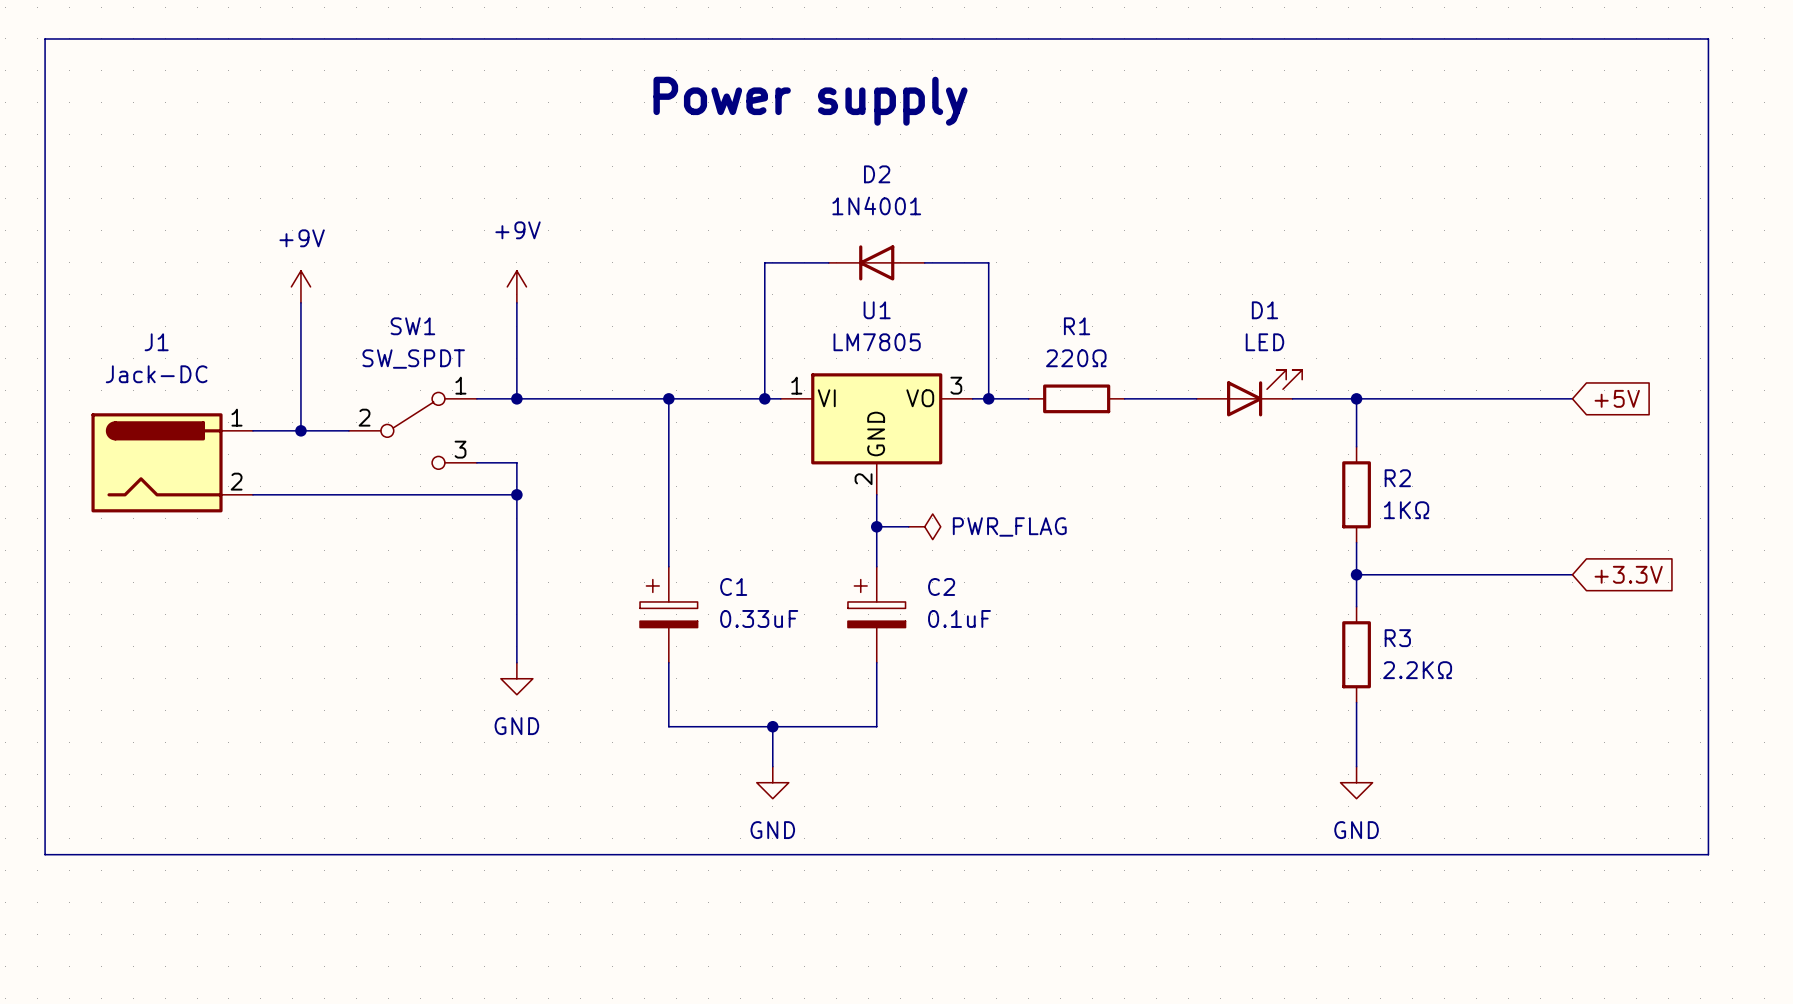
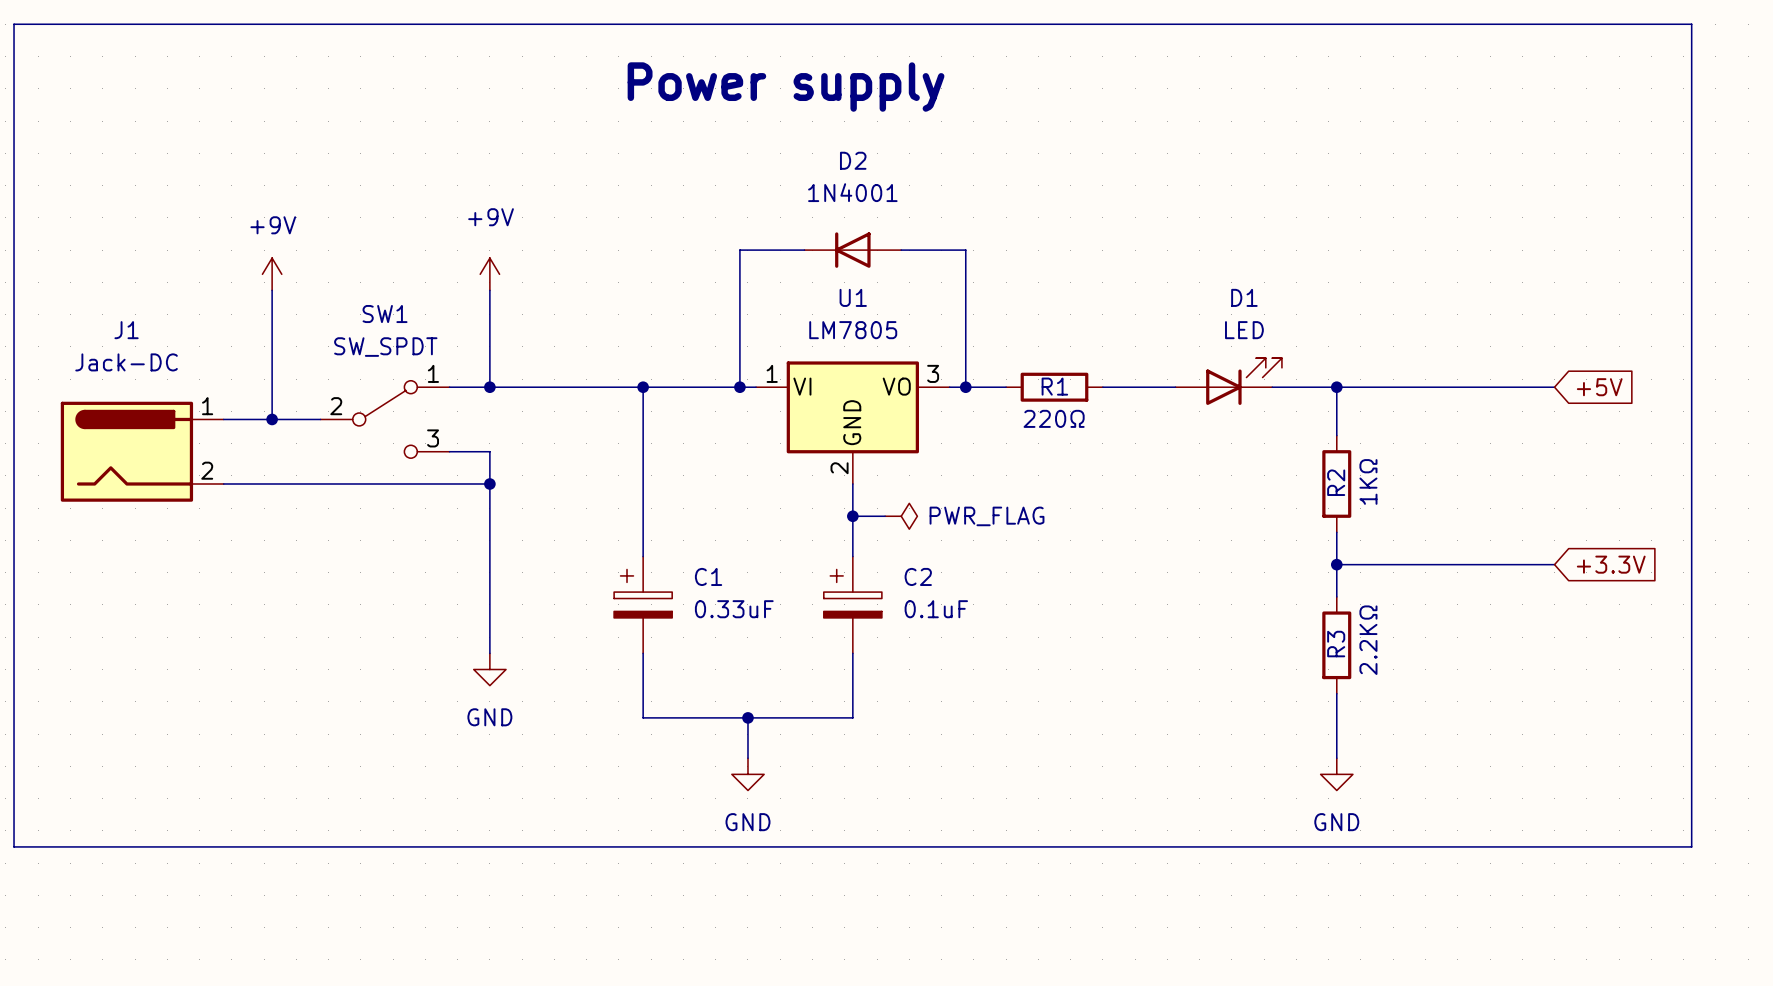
R1 name position: R1 (1077, 326) -> R1 (1054, 386)
R1 value position: 220Ω (1076, 358) -> 220Ω (1054, 418)
R2 name rotation: 0° (1397, 478) -> 90° counterclockwise (1336, 482)
R2 name position: R2 (1397, 478) -> R2 (1336, 482)
R2 value rotation: 0° (1406, 510) -> 90° counterclockwise (1368, 481)
R3 name rotation: 0° (1397, 638) -> 90° counterclockwise (1336, 644)
R3 name position: R3 (1397, 638) -> R3 (1336, 644)
R3 value rotation: 0° (1417, 670) -> 90° counterclockwise (1368, 640)

